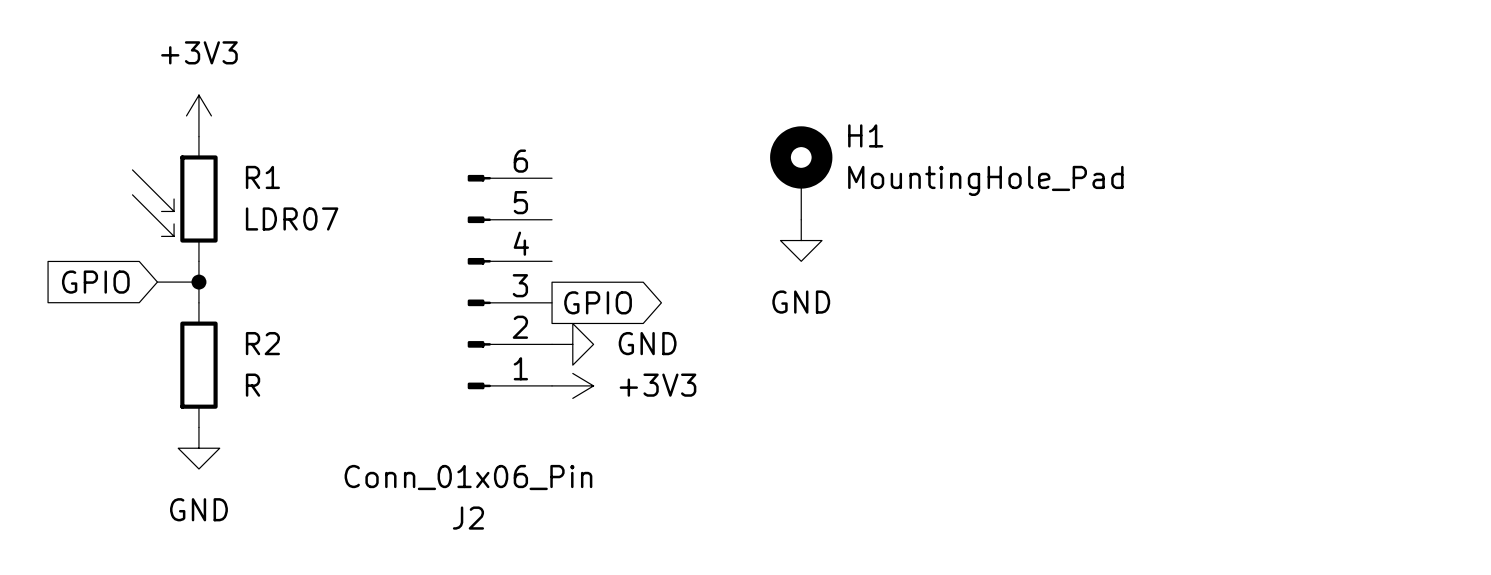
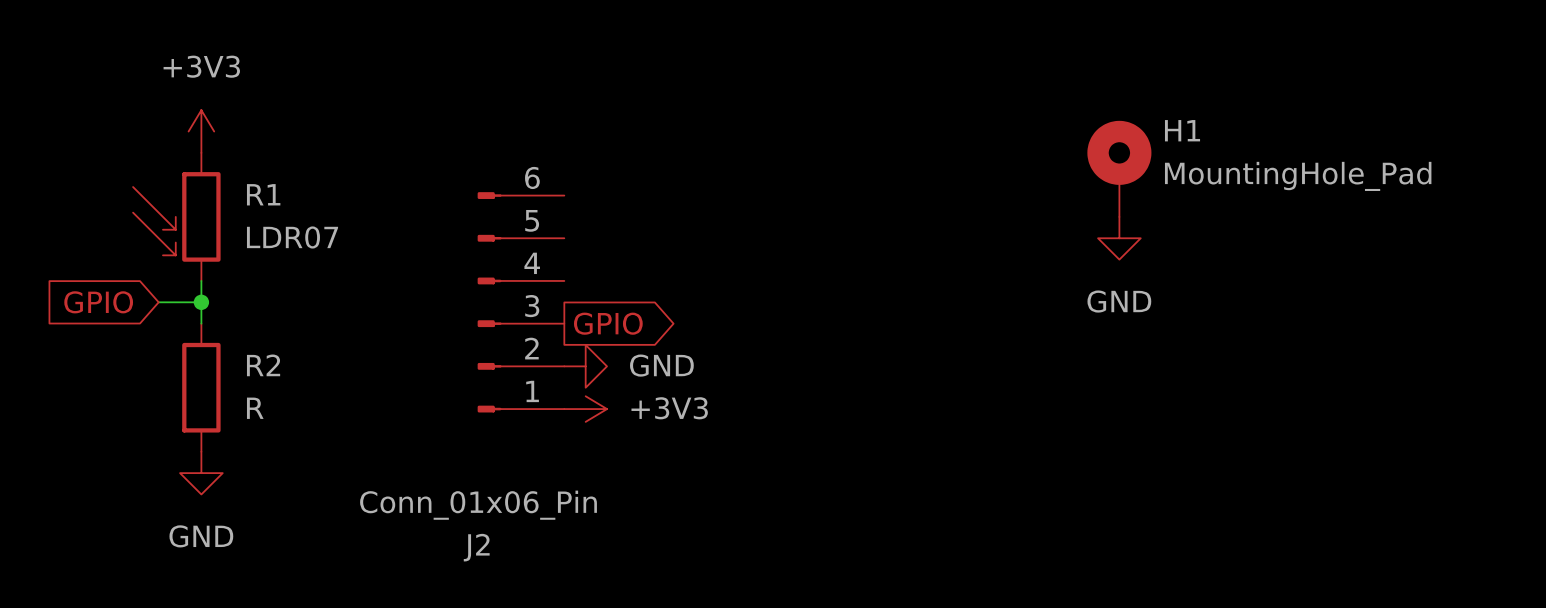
H1 position: (801, 173) -> (1119, 168)
power symbol position: GND (801, 240) -> GND (1119, 238)

